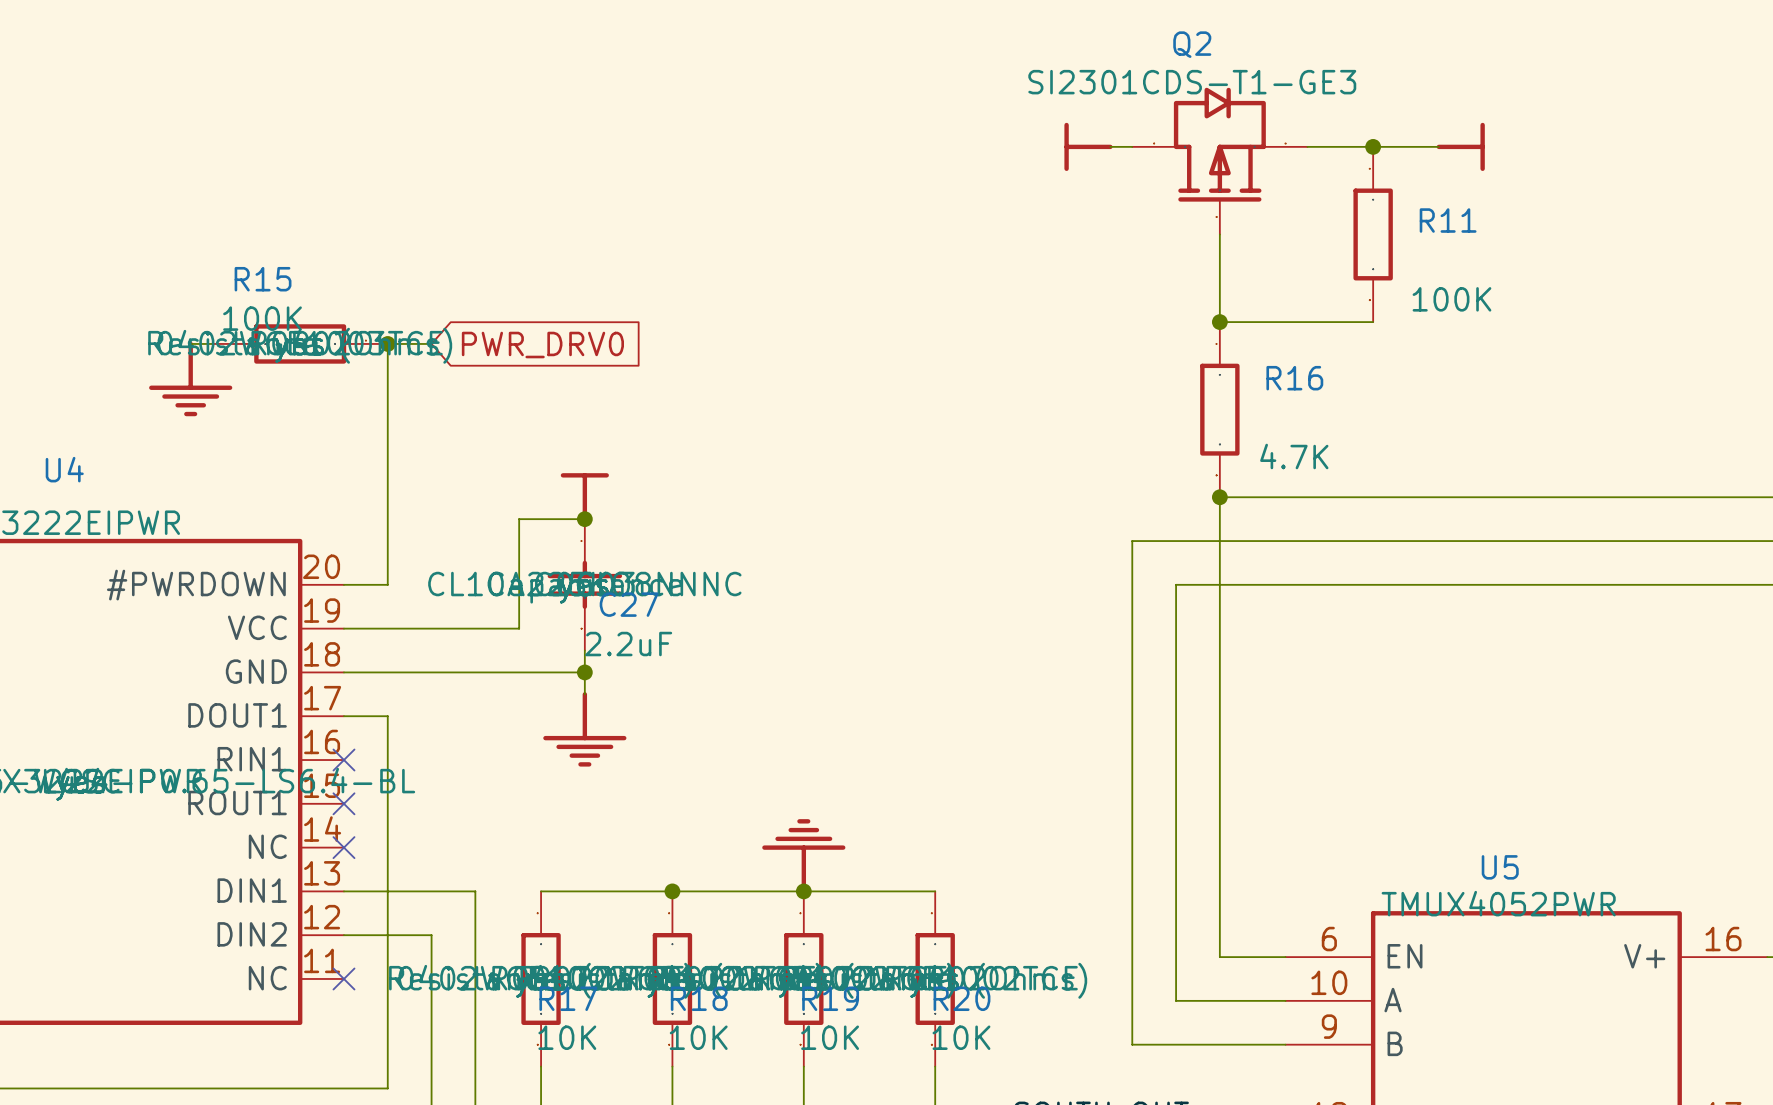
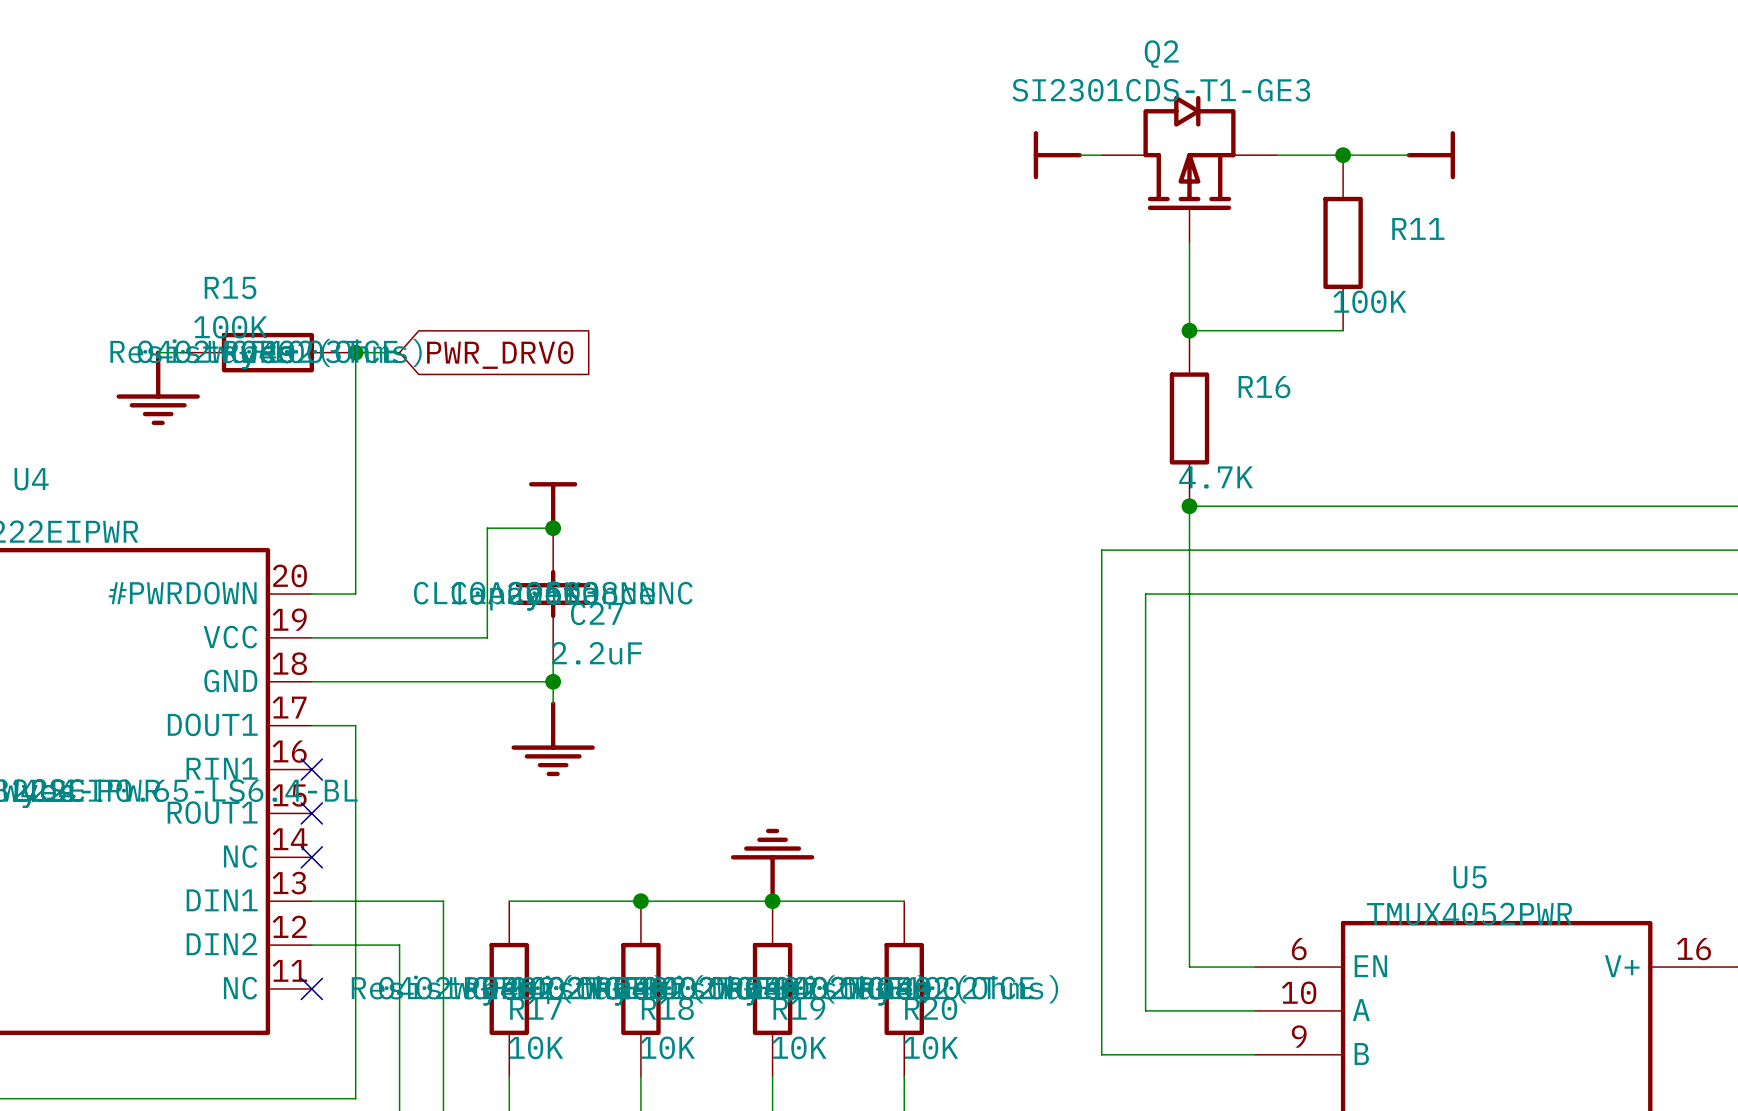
R11 value position: 100K (1451, 299) -> 100K (1369, 301)
R16 value position: 4.7K (1294, 456) -> 4.7K (1216, 477)

